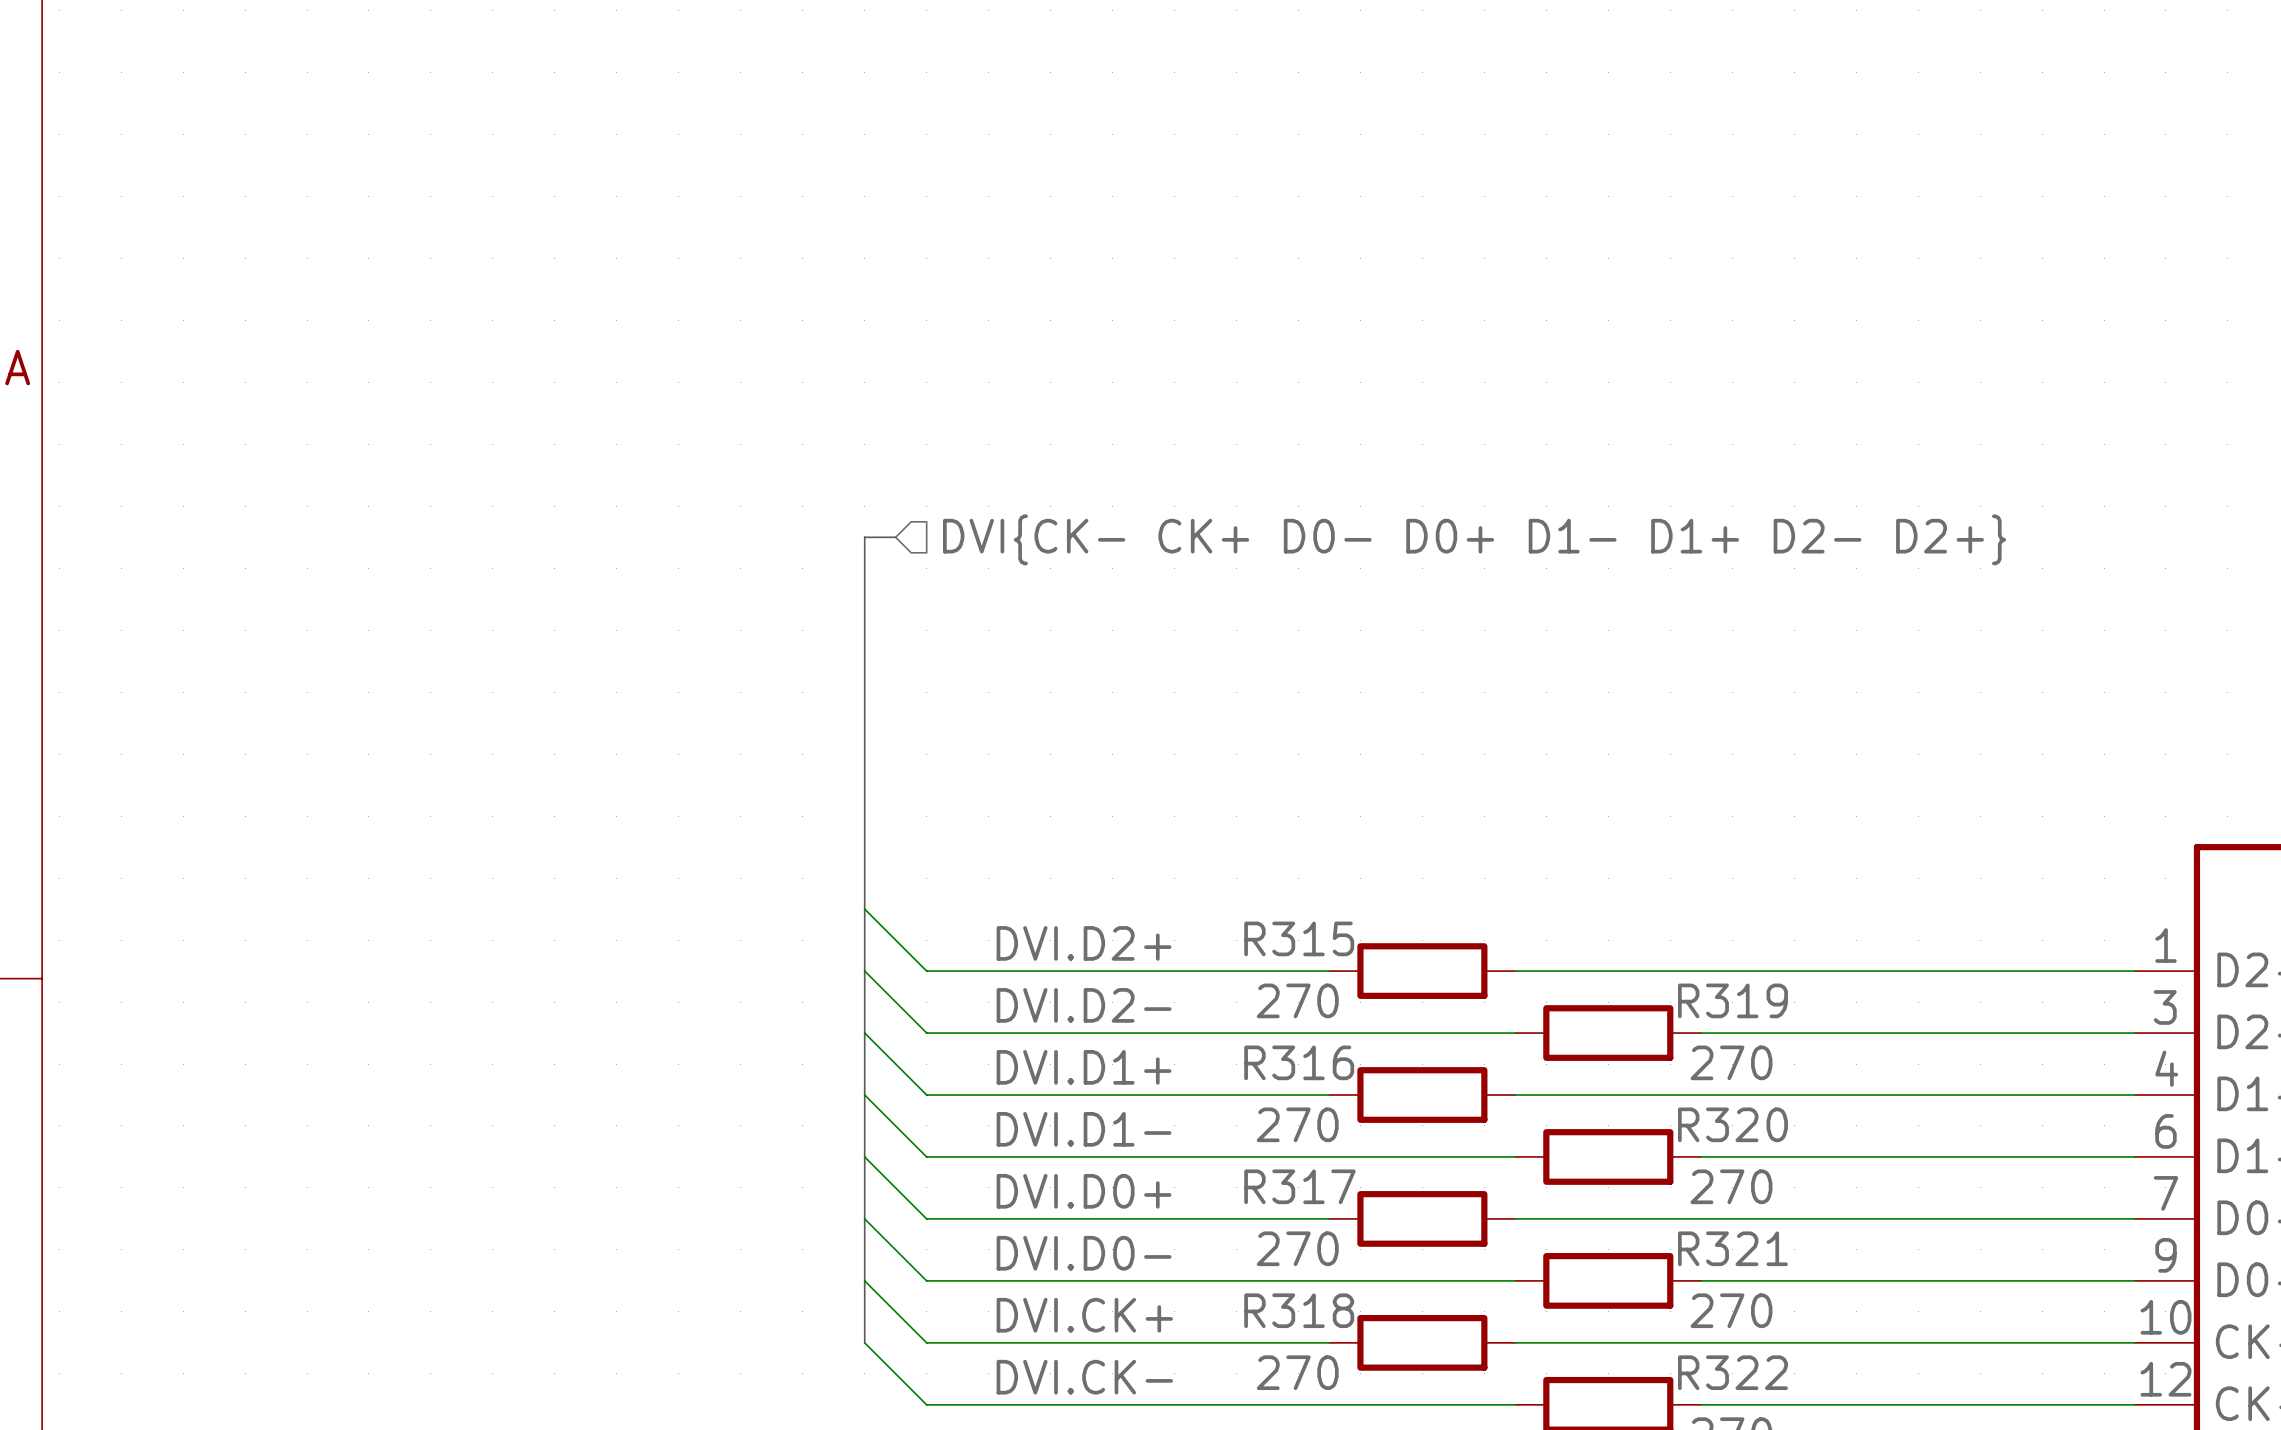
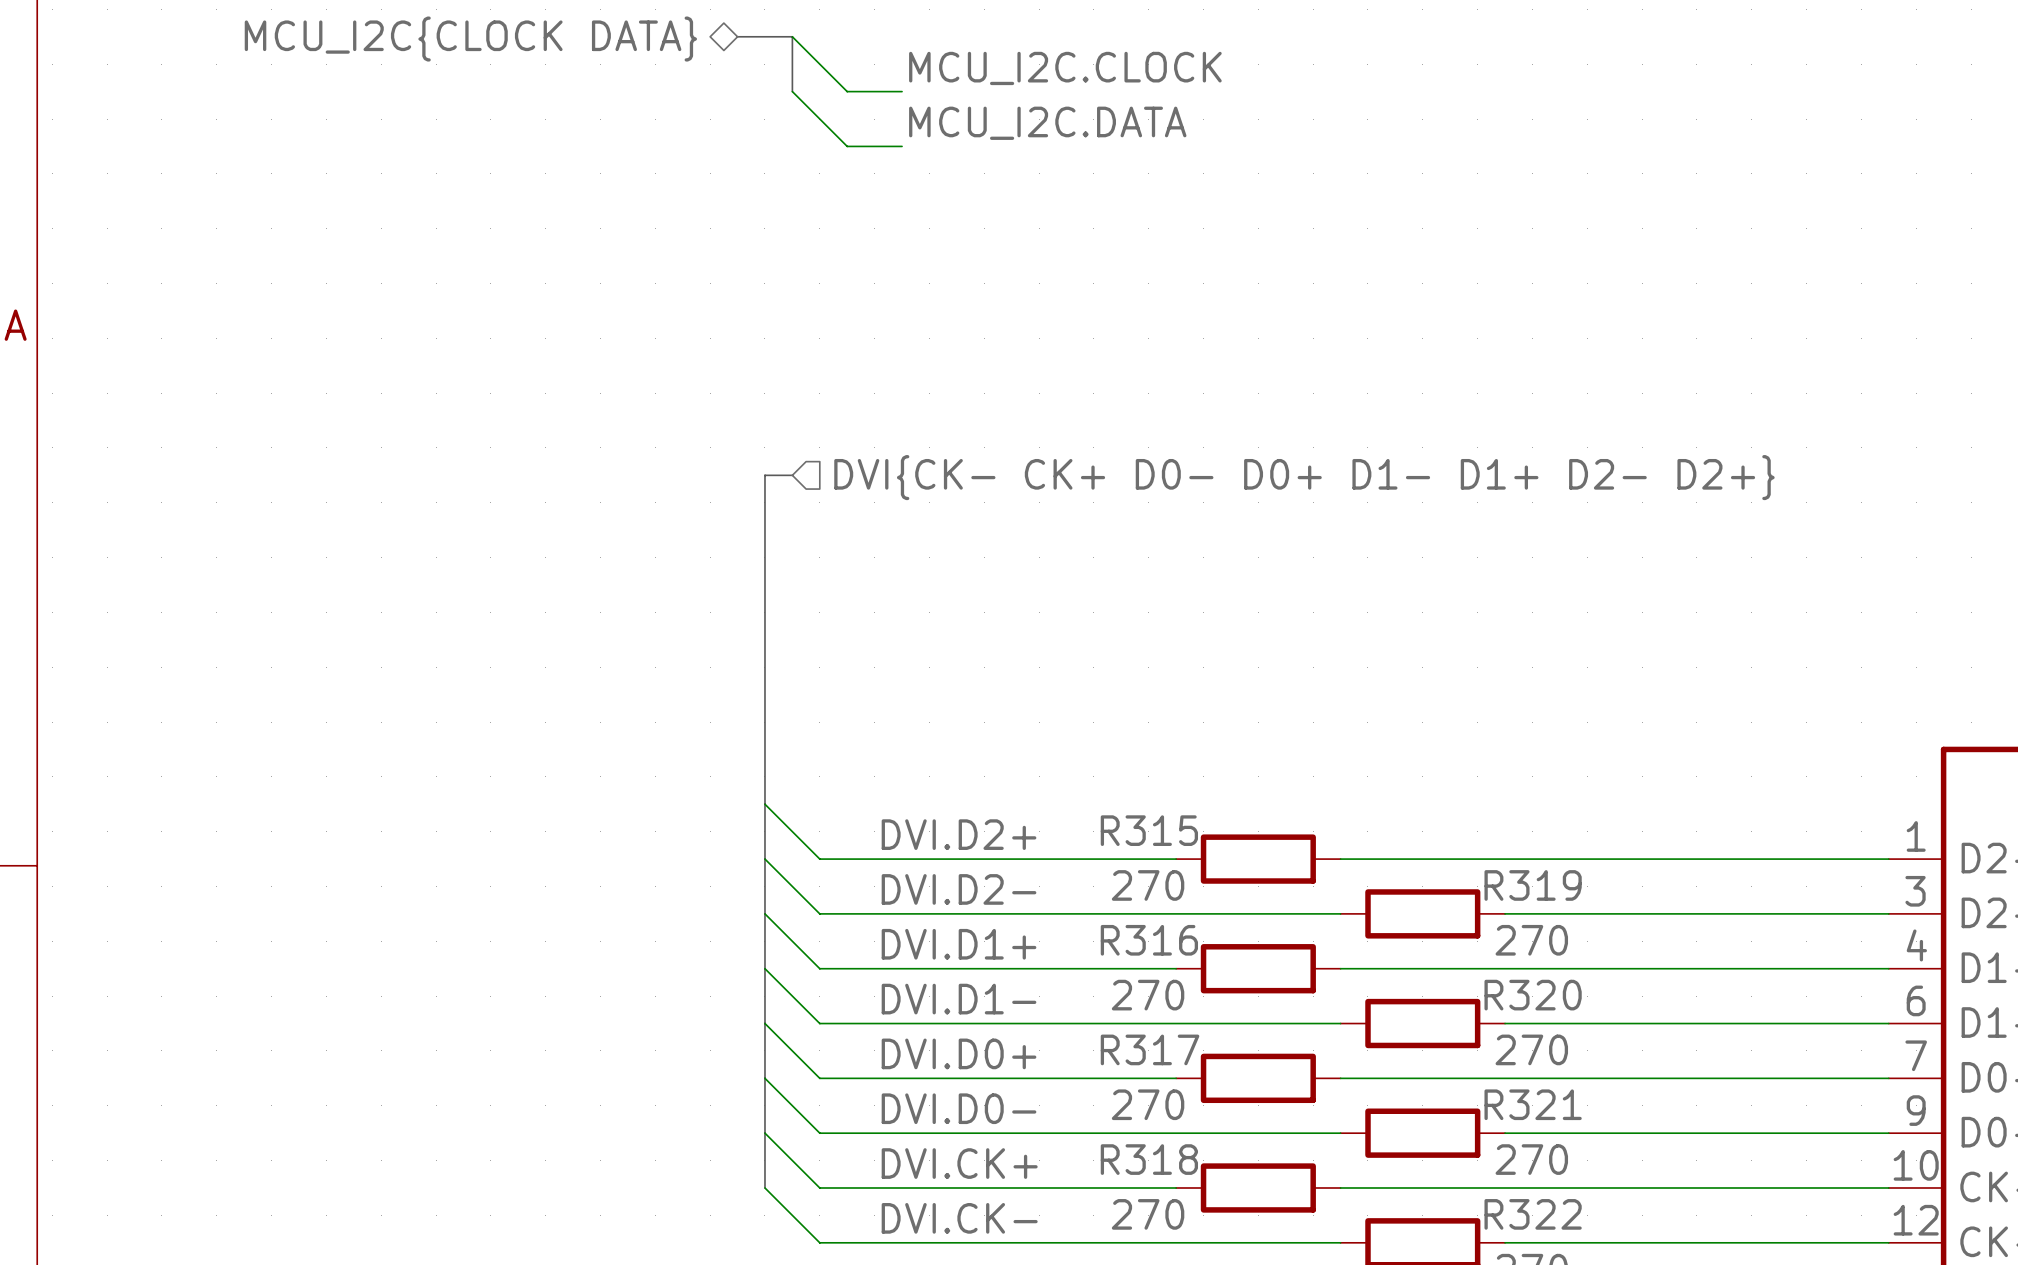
bus: none -> (737, 36) (792, 36) (792, 91)
wire: none -> (792, 36) (847, 91) (902, 91)
hierarchical label: none -> MCU_I2C{CLOCK DATA} (470, 39)
label: none -> MCU_I2C.CLOCK (1065, 68)
wire: none -> (792, 91) (847, 146) (902, 146)
label: none -> MCU_I2C.DATA (1047, 123)

